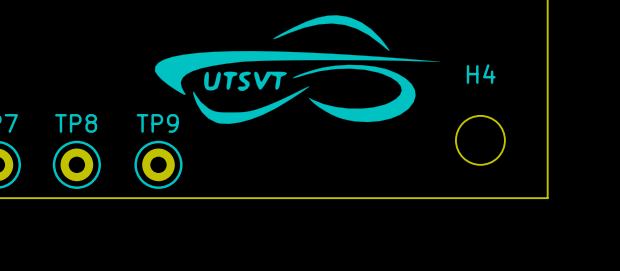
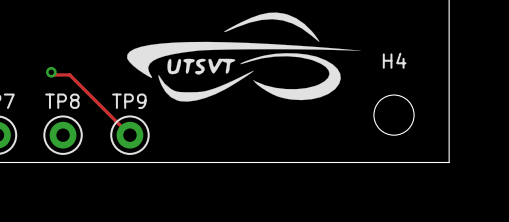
track: none -> (51, 72) (54, 74) (69, 74) (129, 135)
via: none -> (51, 72)

